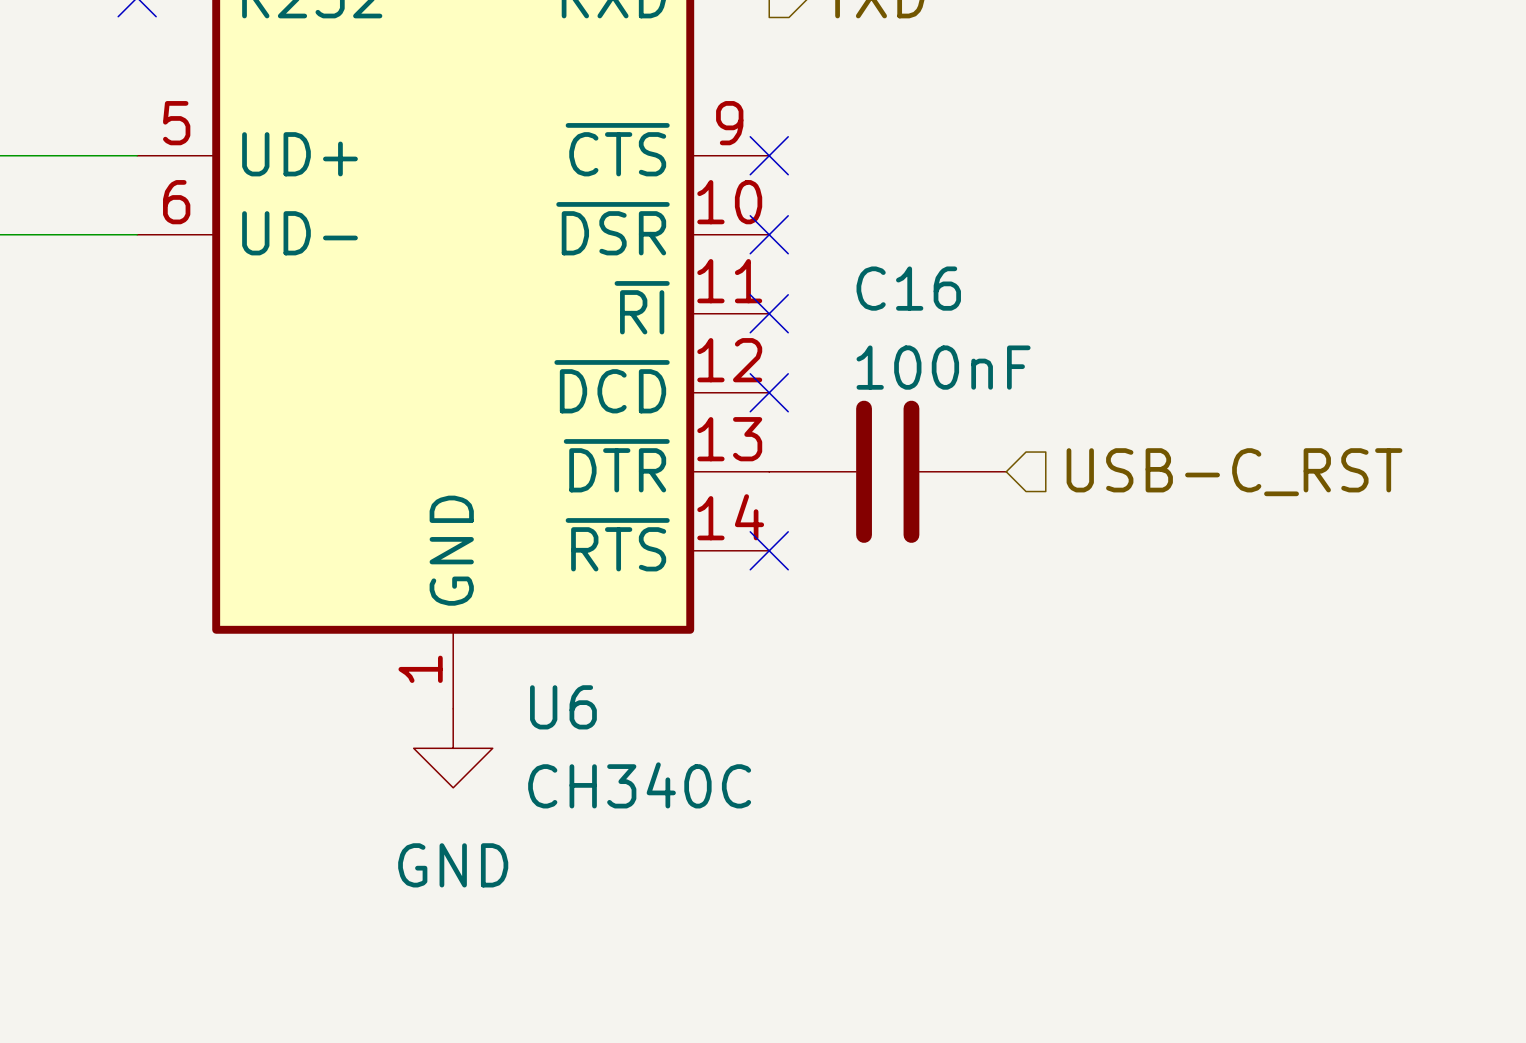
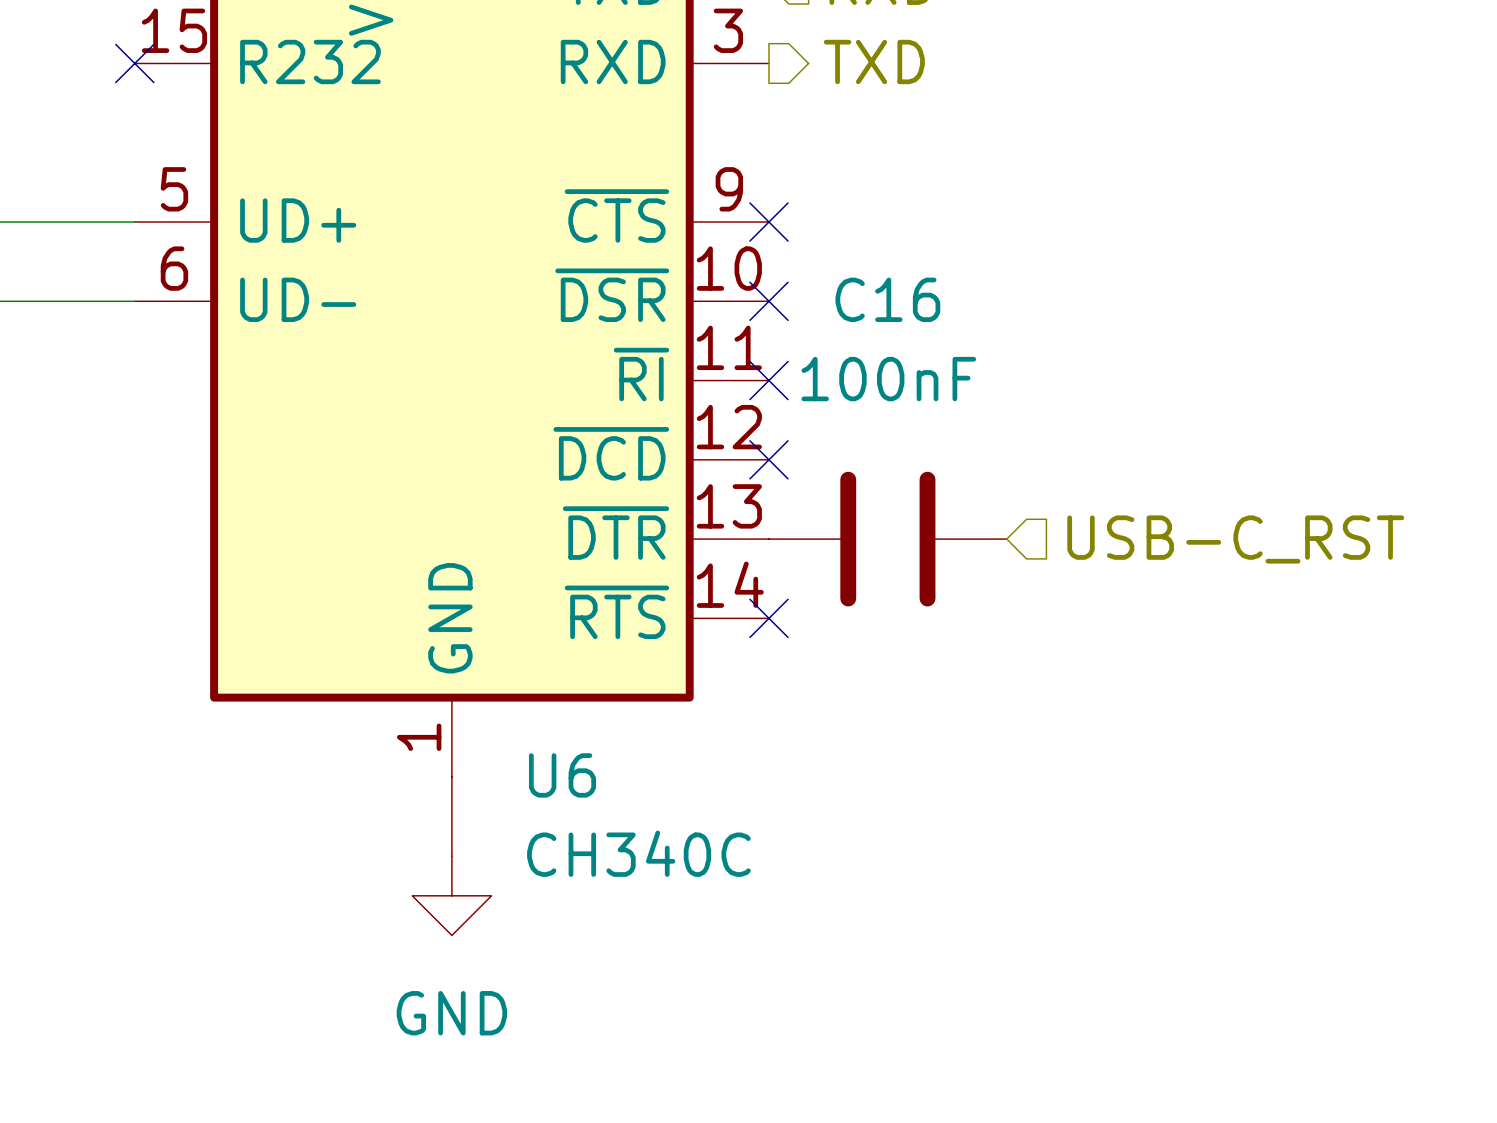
C16 name position: C16 (908, 288) -> C16 (887, 299)
C16 value position: 100nF (943, 367) -> 100nF (888, 379)
C16 symbol: [769, 400, 1007, 543] -> [768, 471, 1007, 607]
power symbol: GND (453, 748) -> none
power symbol: none -> GND (451, 856)

